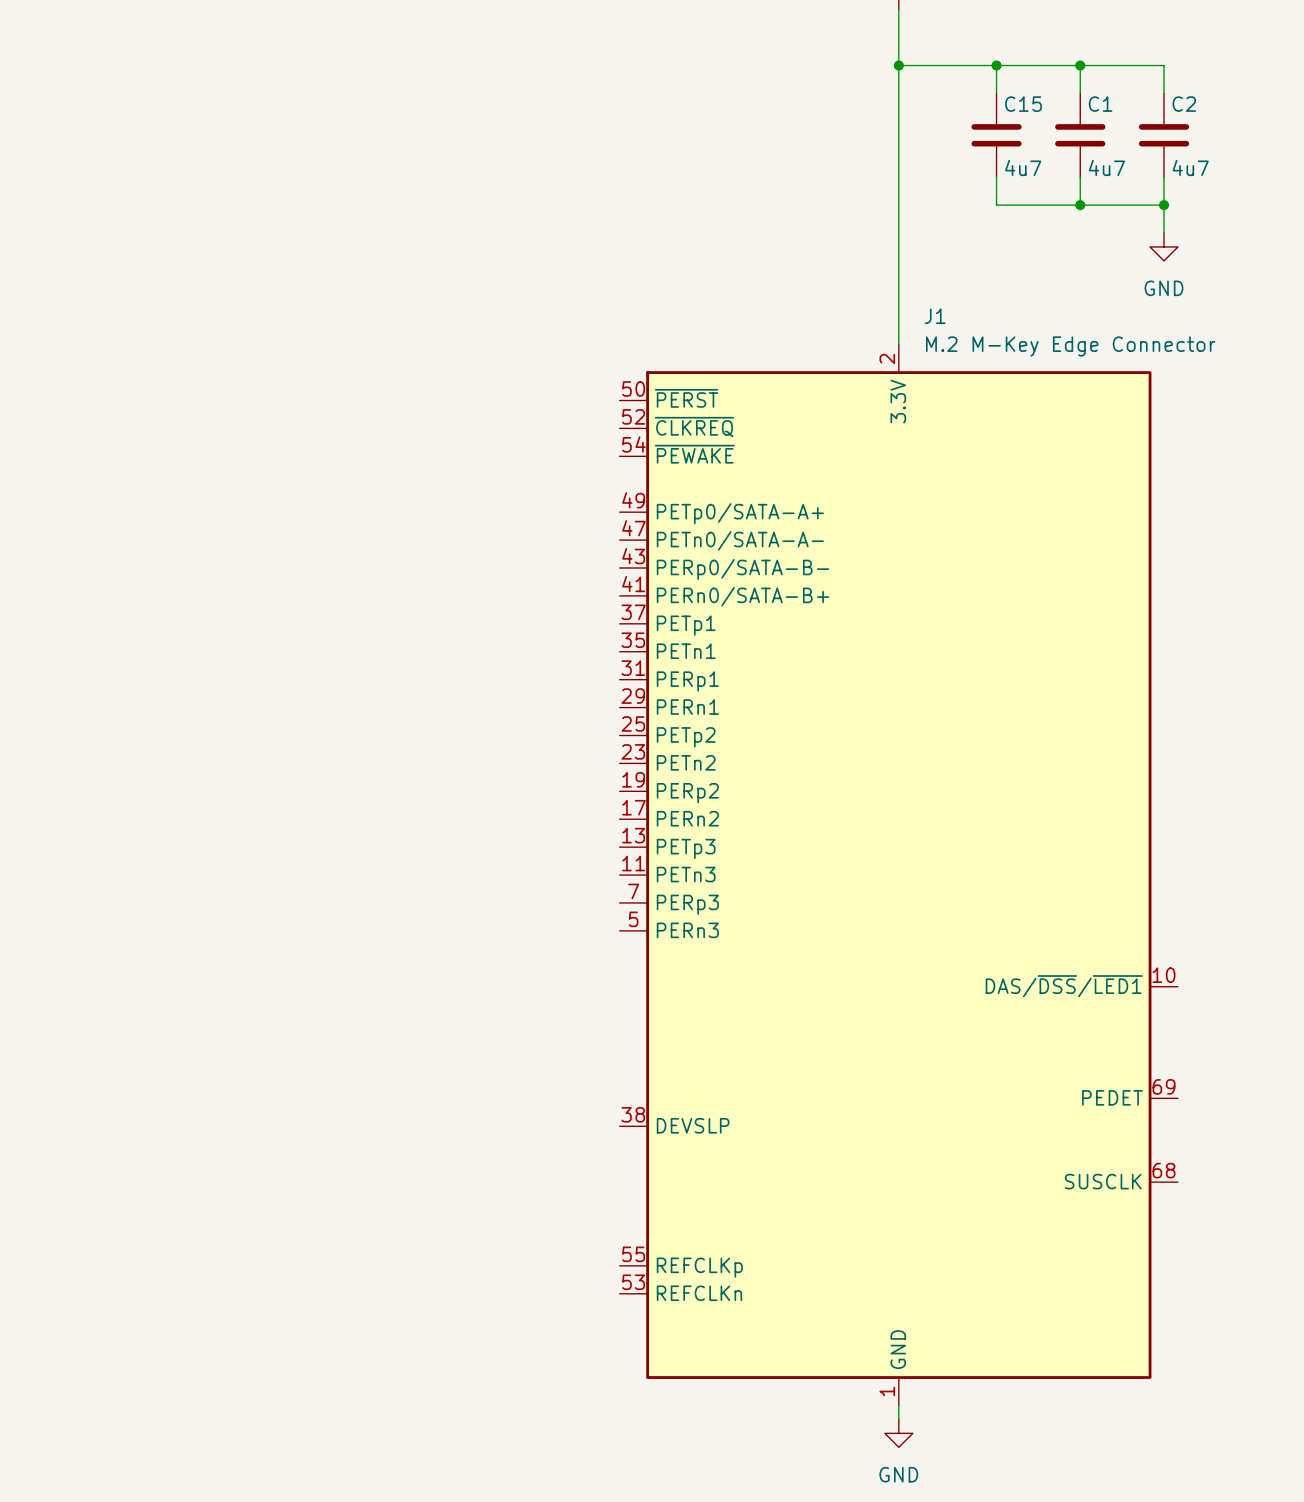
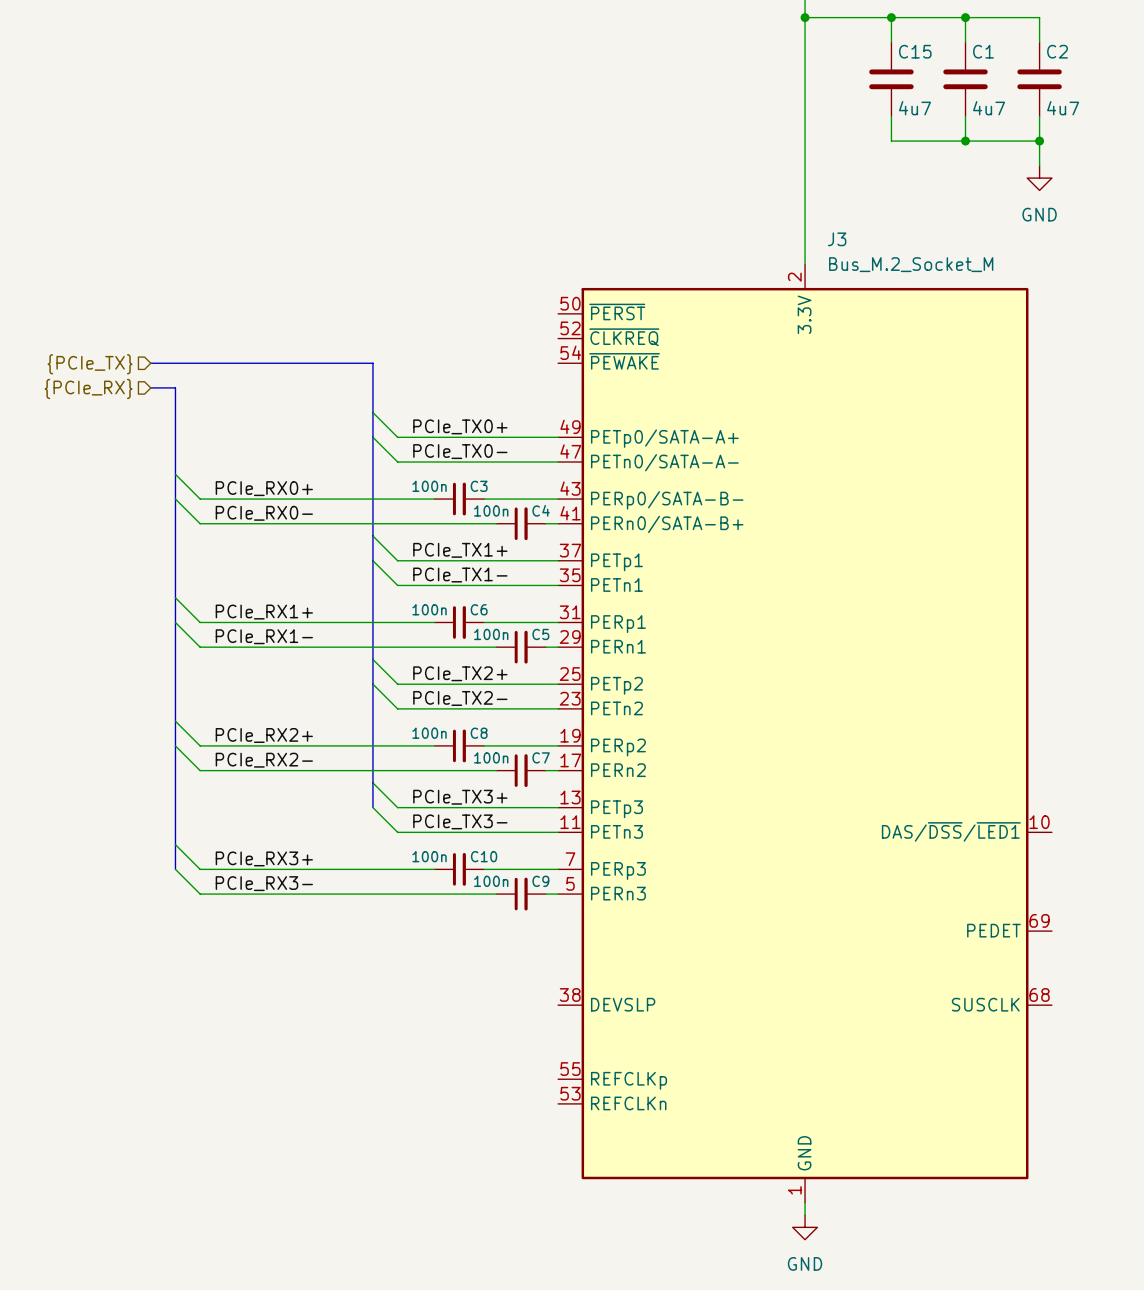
bus: none -> (150, 363) (372, 363) (372, 807)
hierarchical label: none -> {PCIe_TX} (90, 364)
bus: none -> (150, 387) (175, 387) (175, 869)
hierarchical label: none -> {PCIe_RX} (88, 388)
wire: none -> (372, 412) (397, 437) (558, 437)
label: none -> PCIe_TX0+ (460, 426)
wire: none -> (372, 437) (397, 462) (558, 462)
label: none -> PCIe_TX0- (460, 451)
wire: none -> (175, 474) (200, 499) (434, 499)
label: none -> PCIe_RX0+ (264, 488)
wire: none -> (175, 499) (200, 523) (496, 523)
C3: none -> 100n (459, 499)
wire: none -> (484, 499) (558, 499)
label: none -> PCIe_RX0- (264, 513)
C4: none -> 100n (521, 523)
wire: none -> (545, 523) (558, 523)
wire: none -> (372, 536) (397, 560) (558, 560)
label: none -> PCIe_TX1+ (460, 550)
wire: none -> (372, 560) (397, 585) (558, 585)
label: none -> PCIe_TX1- (460, 575)
wire: none -> (175, 597) (200, 622) (434, 622)
label: none -> PCIe_RX1+ (264, 612)
wire: none -> (175, 622) (200, 647) (496, 647)
C6: none -> 100n (459, 622)
wire: none -> (484, 622) (558, 622)
label: none -> PCIe_RX1- (264, 636)
C5: none -> 100n (521, 647)
wire: none -> (545, 647) (558, 647)
wire: none -> (372, 659) (397, 684) (558, 684)
label: none -> PCIe_TX2+ (460, 673)
wire: none -> (372, 684) (397, 708) (558, 708)
label: none -> PCIe_TX2- (460, 698)
wire: none -> (175, 721) (200, 745) (434, 745)
J1: M.2 M-Key Edge Connector (898, 875) -> none
J3: none -> Bus_M.2_Socket_M (805, 733)
label: none -> PCIe_RX2+ (264, 735)
wire: none -> (175, 745) (200, 770) (496, 770)
C8: none -> 100n (459, 745)
wire: none -> (484, 745) (558, 745)
label: none -> PCIe_RX2- (264, 760)
C7: none -> 100n (521, 770)
wire: none -> (545, 770) (558, 770)
wire: none -> (372, 782) (397, 807) (558, 807)
label: none -> PCIe_TX3+ (460, 797)
wire: none -> (372, 807) (397, 832) (558, 832)
label: none -> PCIe_TX3- (460, 821)
wire: none -> (175, 844) (200, 869) (434, 869)
label: none -> PCIe_RX3+ (264, 858)
wire: none -> (175, 869) (200, 894) (496, 894)
C10: none -> 100n (459, 869)
wire: none -> (484, 869) (558, 869)
label: none -> PCIe_RX3- (264, 883)
C9: none -> 100n (521, 894)
wire: none -> (545, 894) (558, 894)

